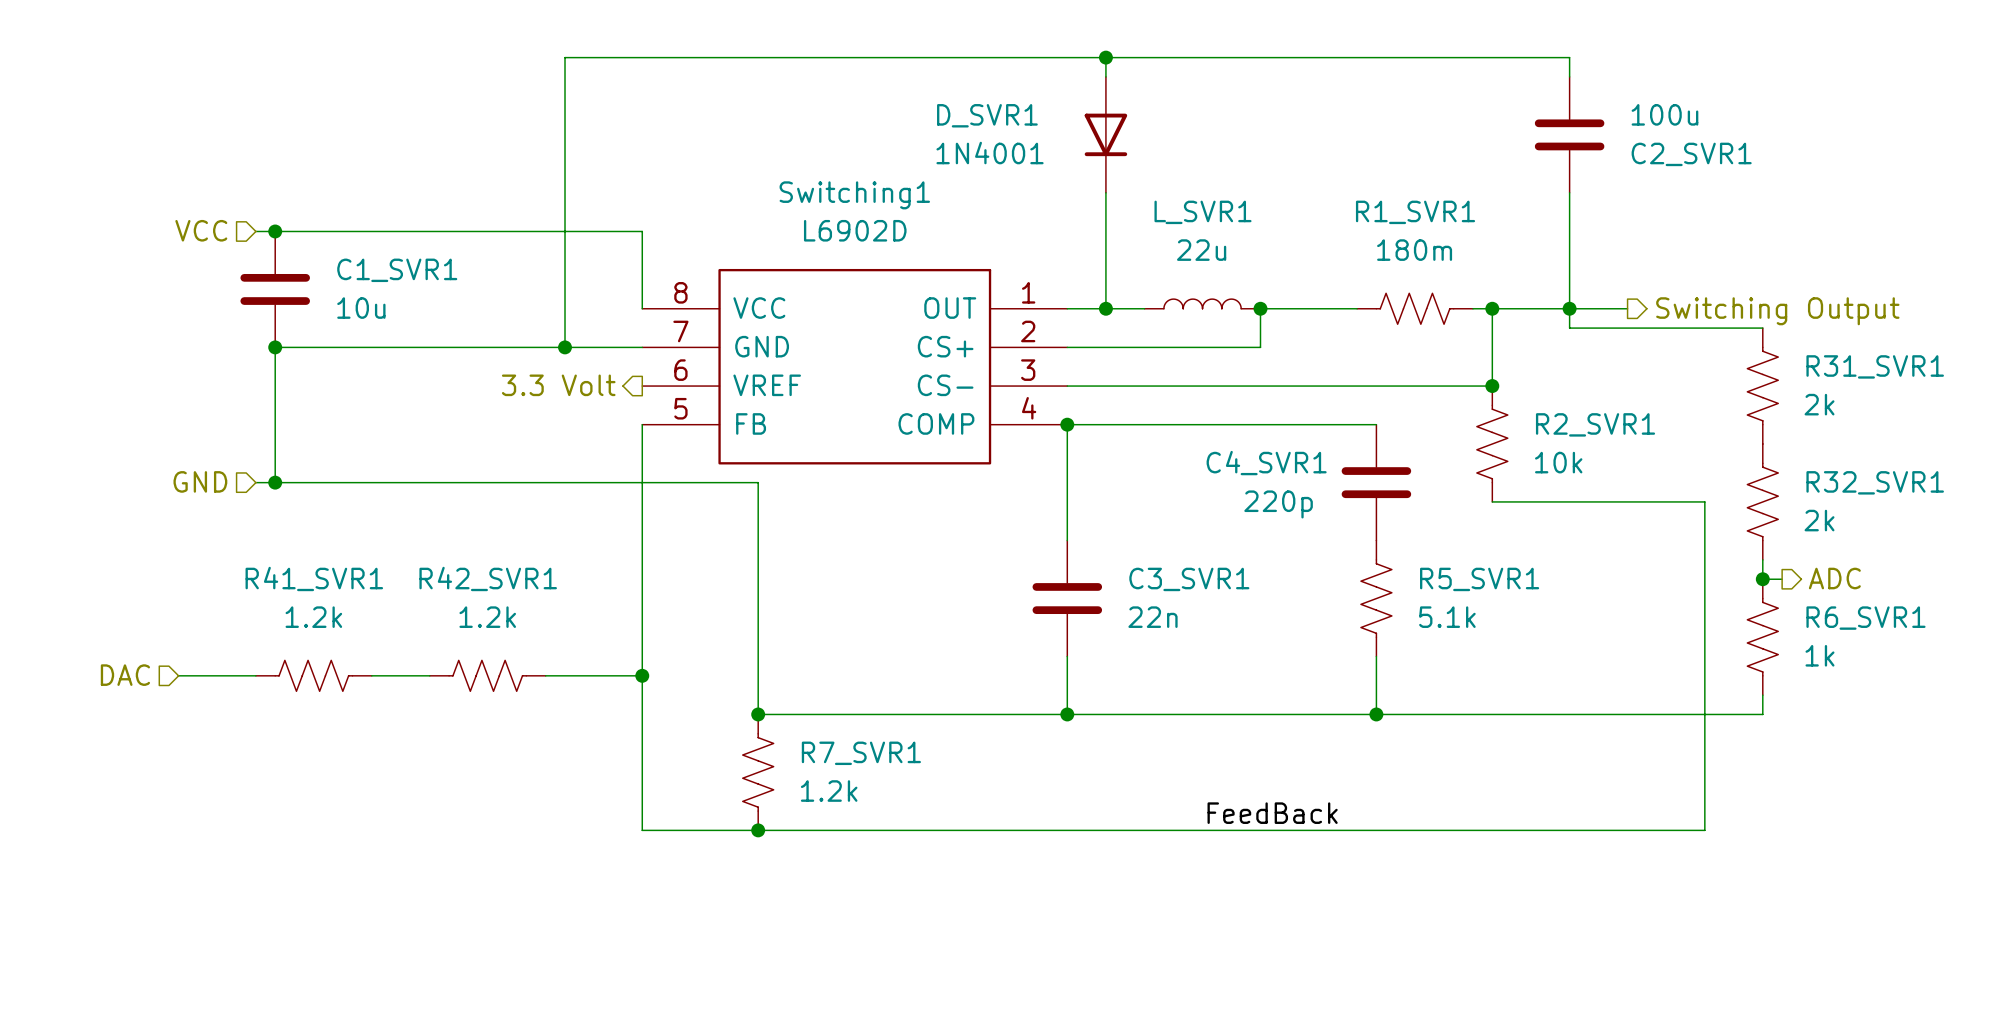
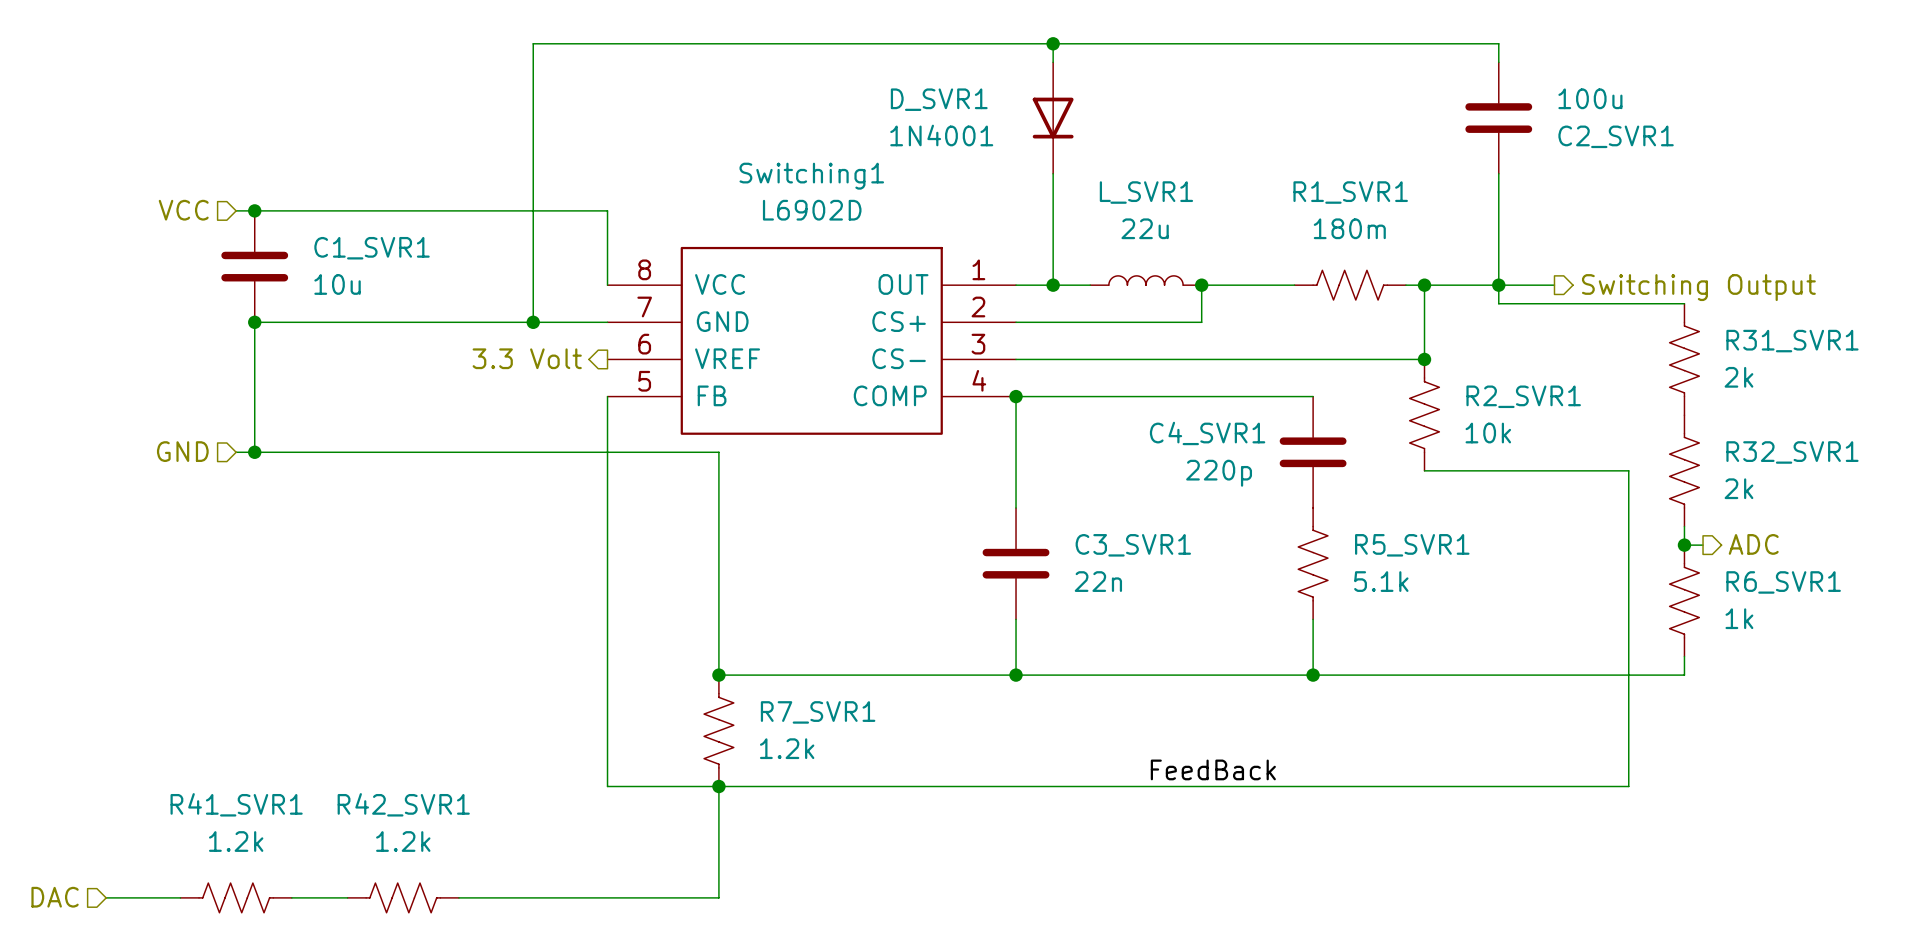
hierarchical label position: DAC (125, 675) -> DAC (55, 897)
wire: (178, 675) (255, 675) -> (106, 897) (180, 897)
R41_SVR1 position: (313, 675) -> (236, 897)
wire: (371, 675) (429, 675) -> (291, 897) (347, 897)
R42_SVR1 position: (487, 675) -> (403, 897)
wire: (545, 675) (642, 675) -> none
junction: (642, 675) -> none
wire: none -> (718, 786) (718, 897) (458, 897)

